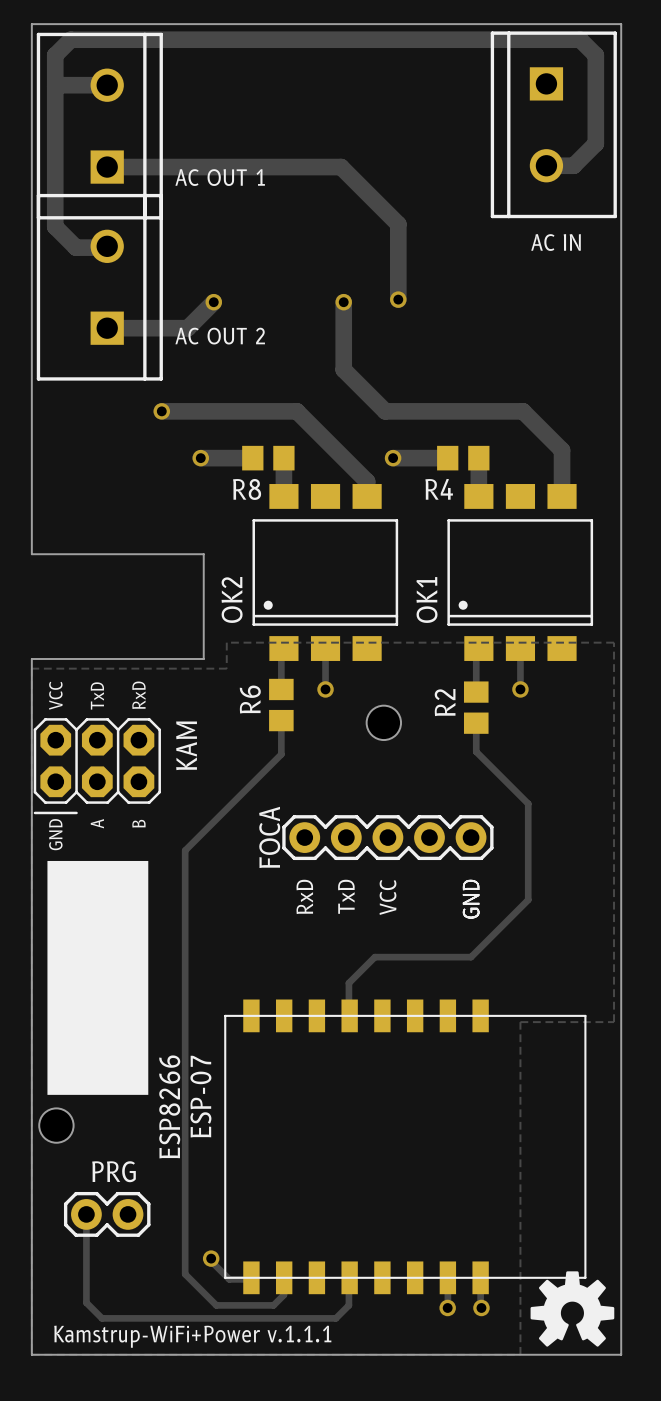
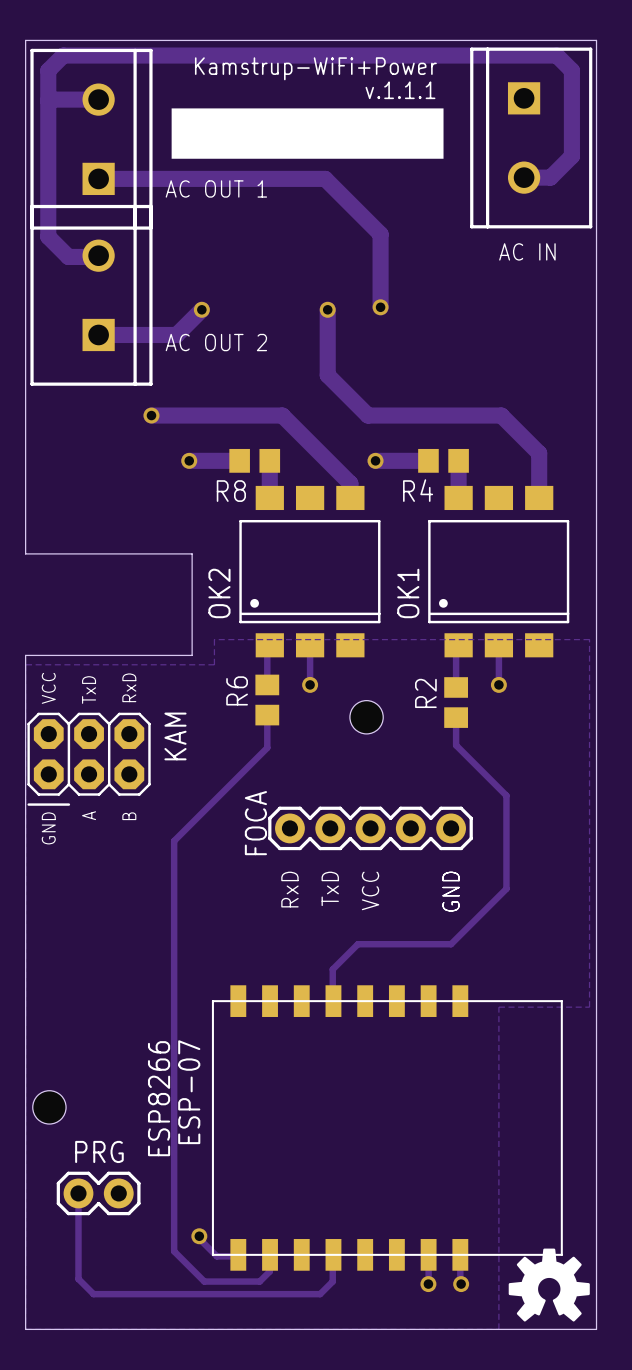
text: none -> Kamstrup-WiFi+Power (315, 68)
text: none -> v.1.1.1 (400, 90)
drawing: none -> [171, 108, 444, 159]
drawing: [47, 860, 149, 1095] -> none
text: Kamstrup-WiFi+Power v.1.1.1 (192, 1336) -> none

